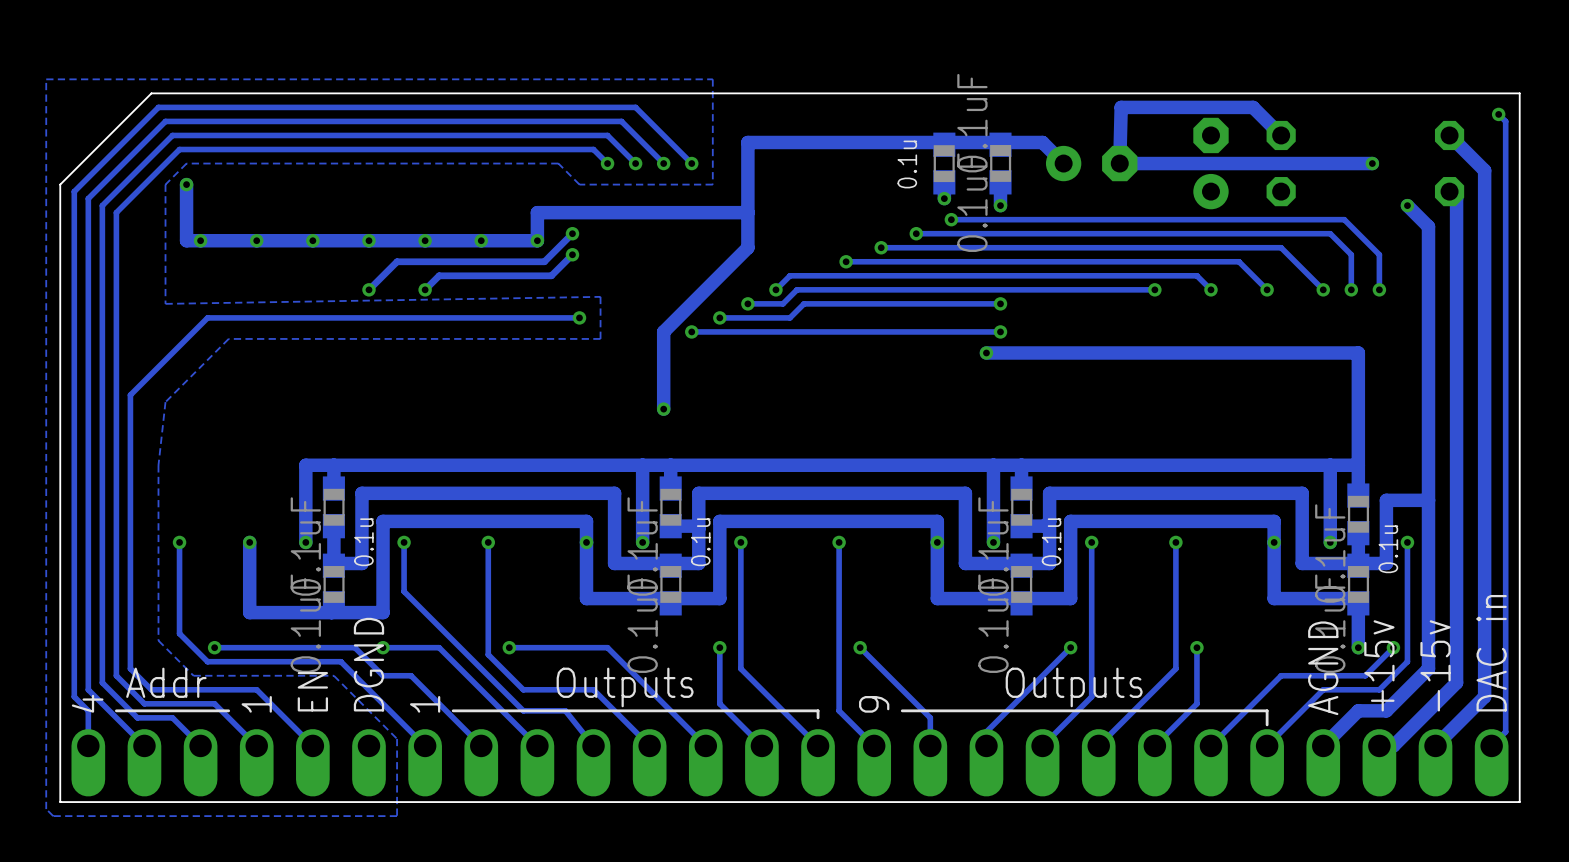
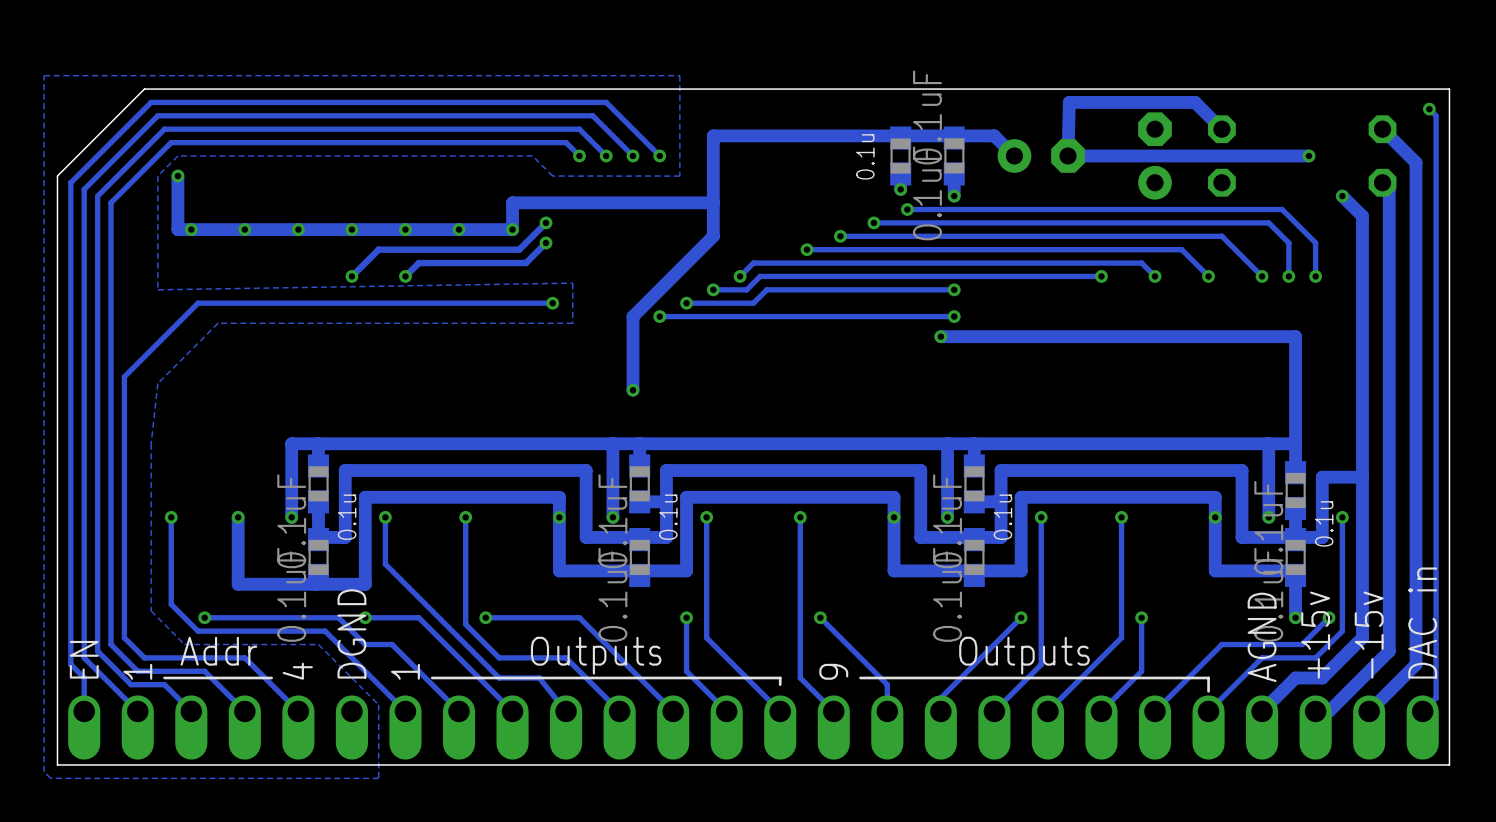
text position: Addr (166, 682) -> Addr (218, 651)
text: EN (312, 691) -> 4 (297, 671)
text: 4 (87, 703) -> EN (84, 659)
text position: 1 (256, 704) -> 1 (137, 671)
line: (172, 710) (116, 710) -> (271, 677) (218, 677)

